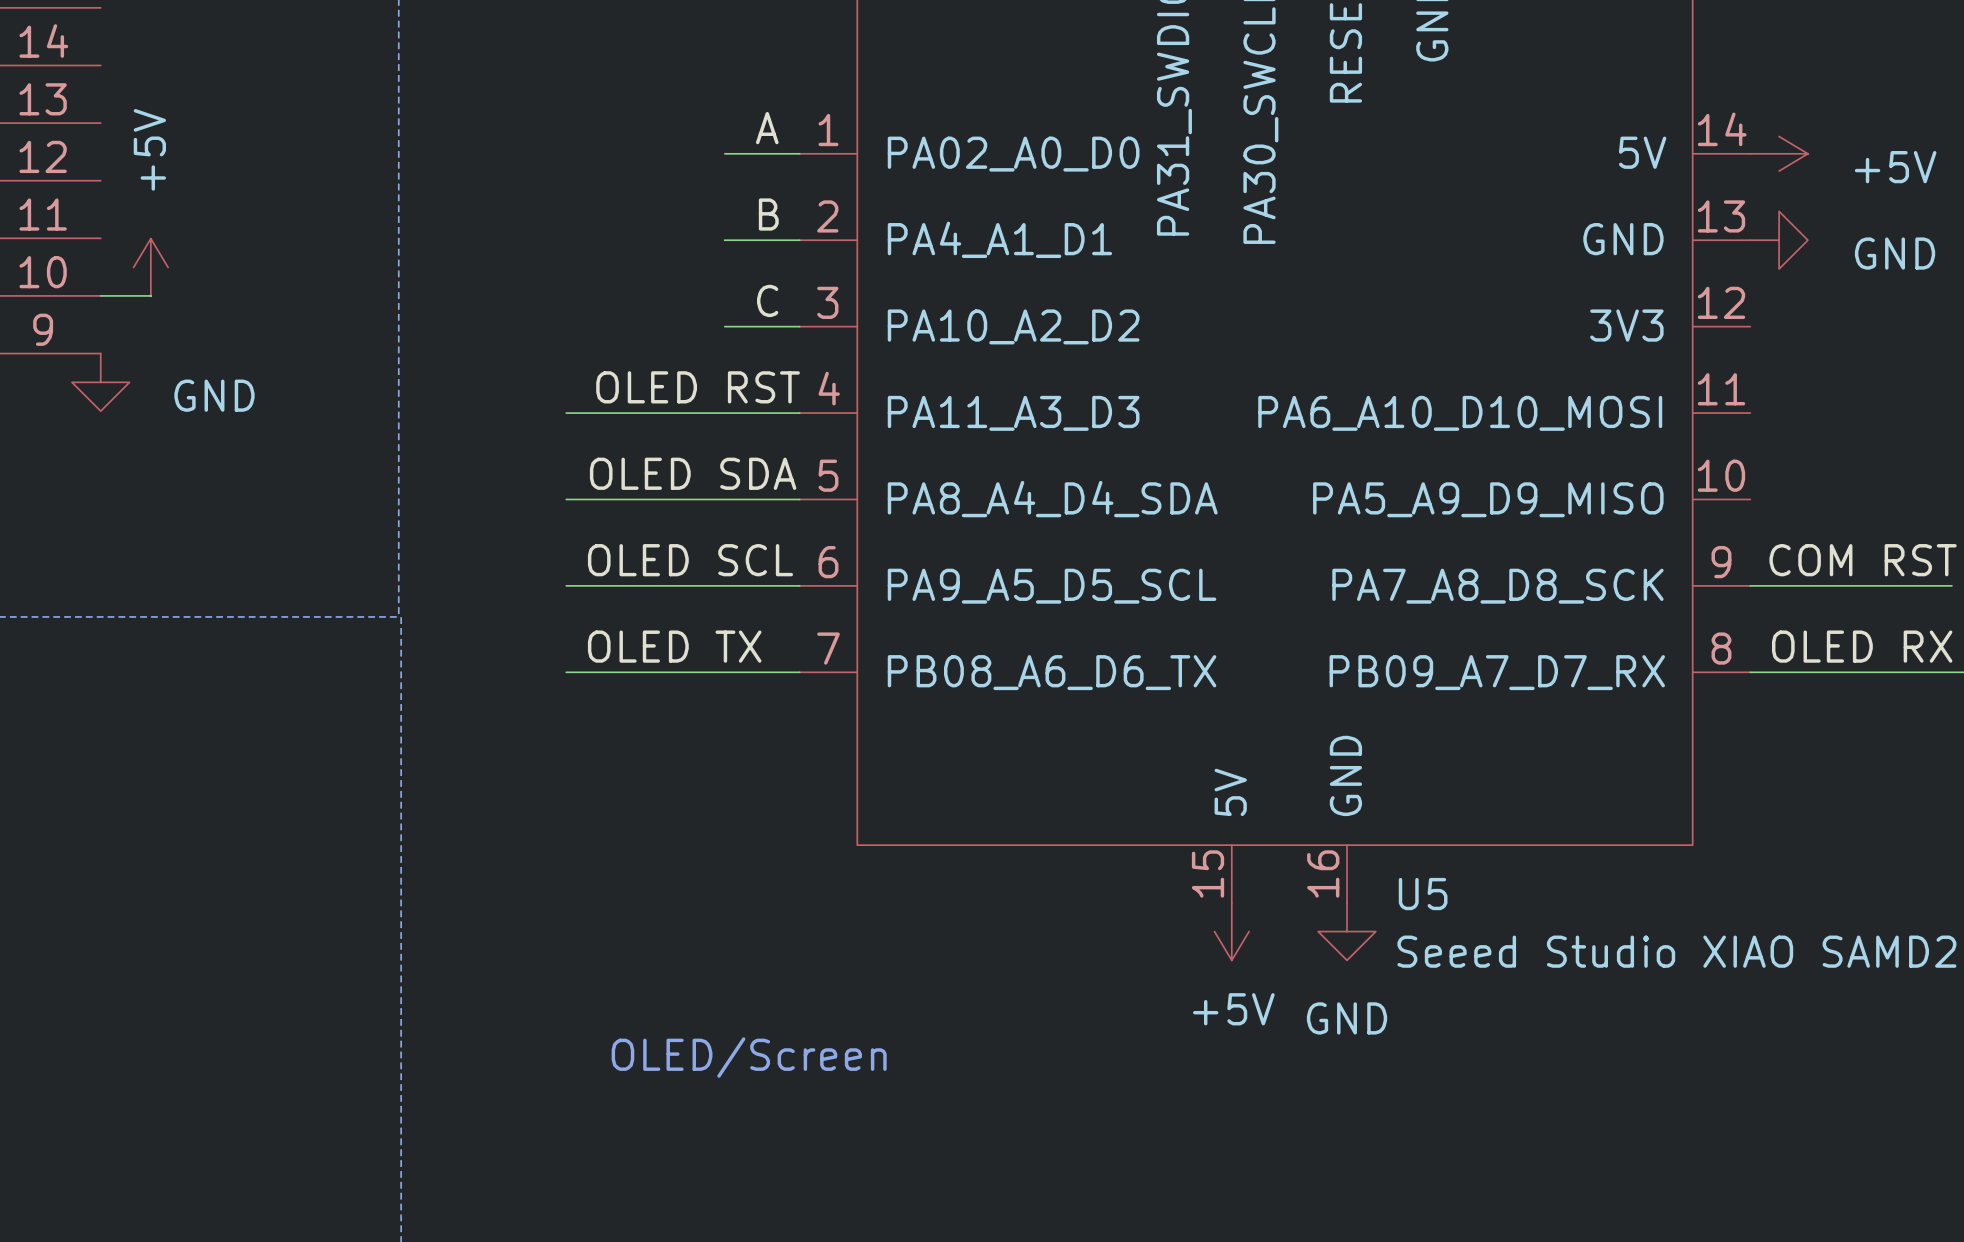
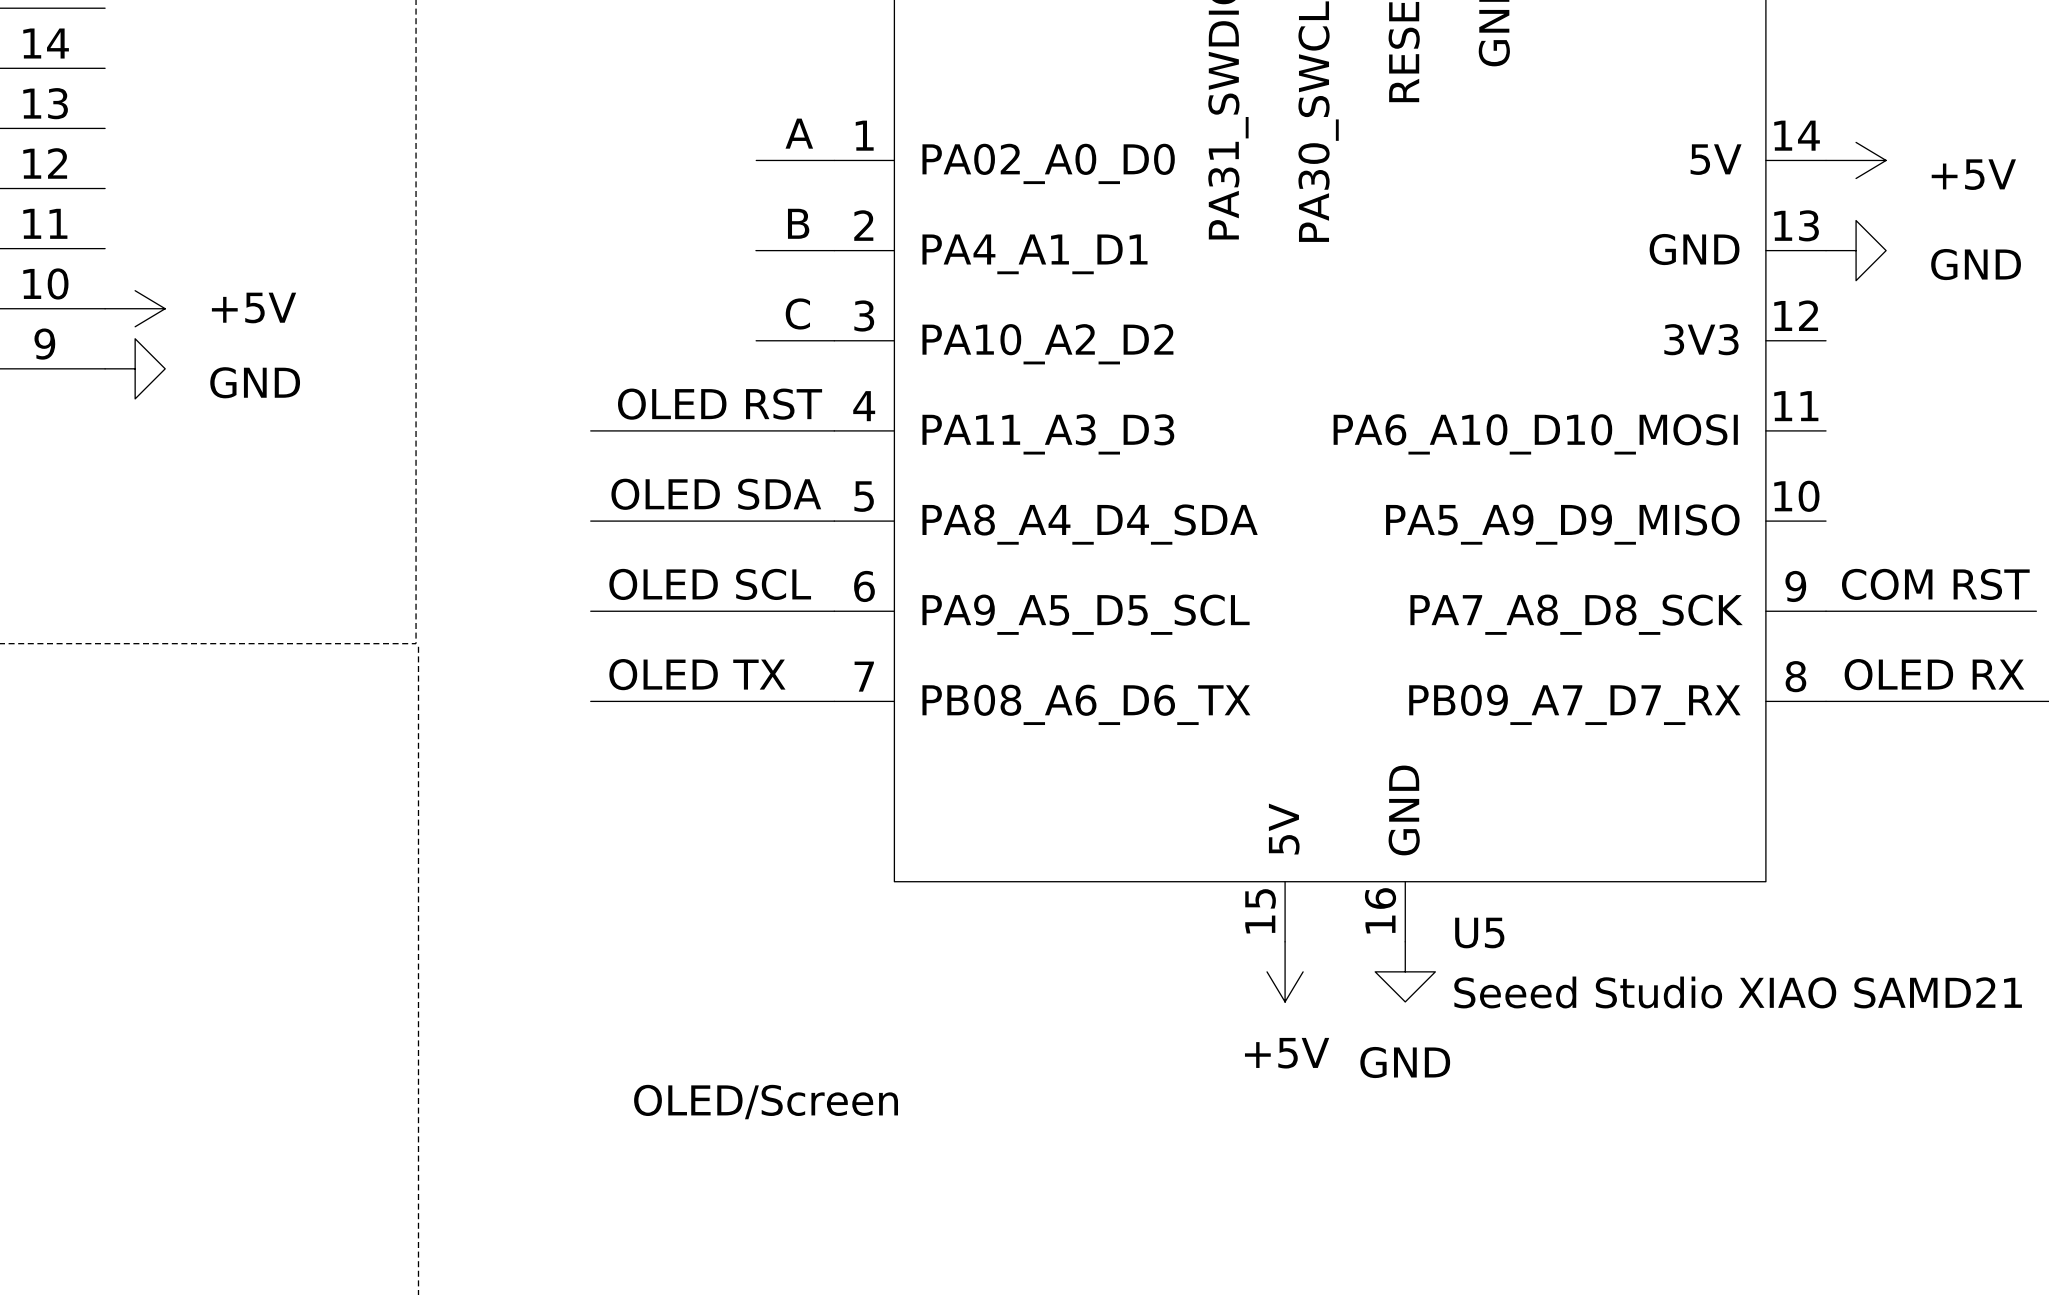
power symbol rotation: 0° (150, 267) -> 90° clockwise (135, 308)
power symbol position: +5V (150, 267) -> +5V (135, 308)
power symbol rotation: 0° (100, 382) -> 90° counterclockwise (135, 368)
power symbol position: GND (100, 382) -> GND (135, 368)

